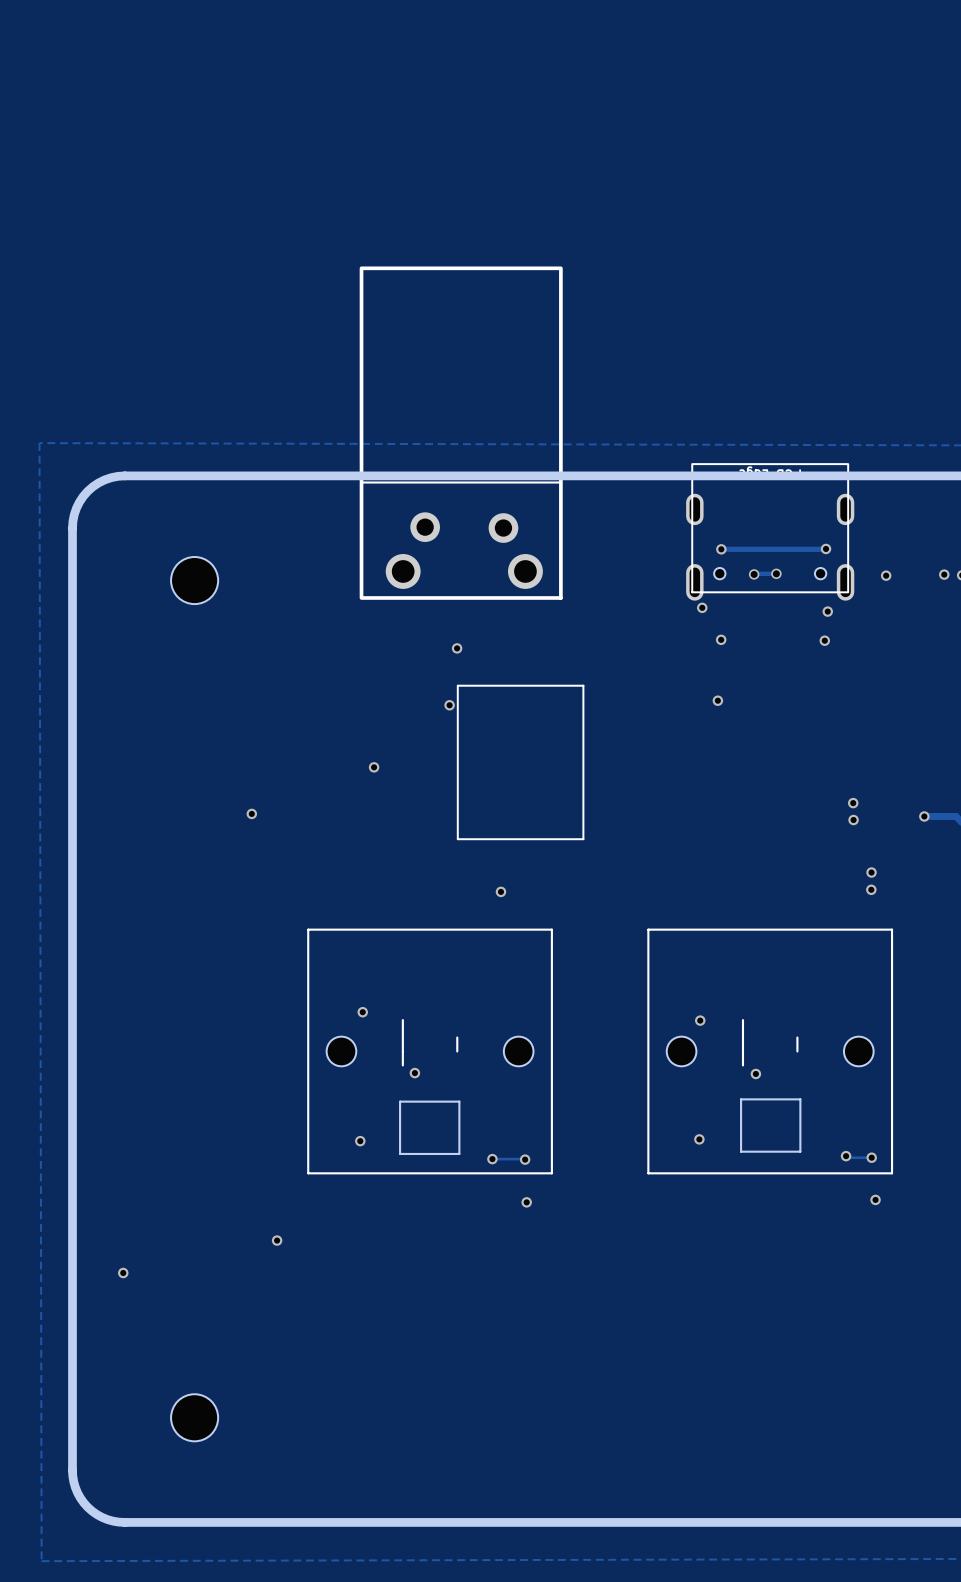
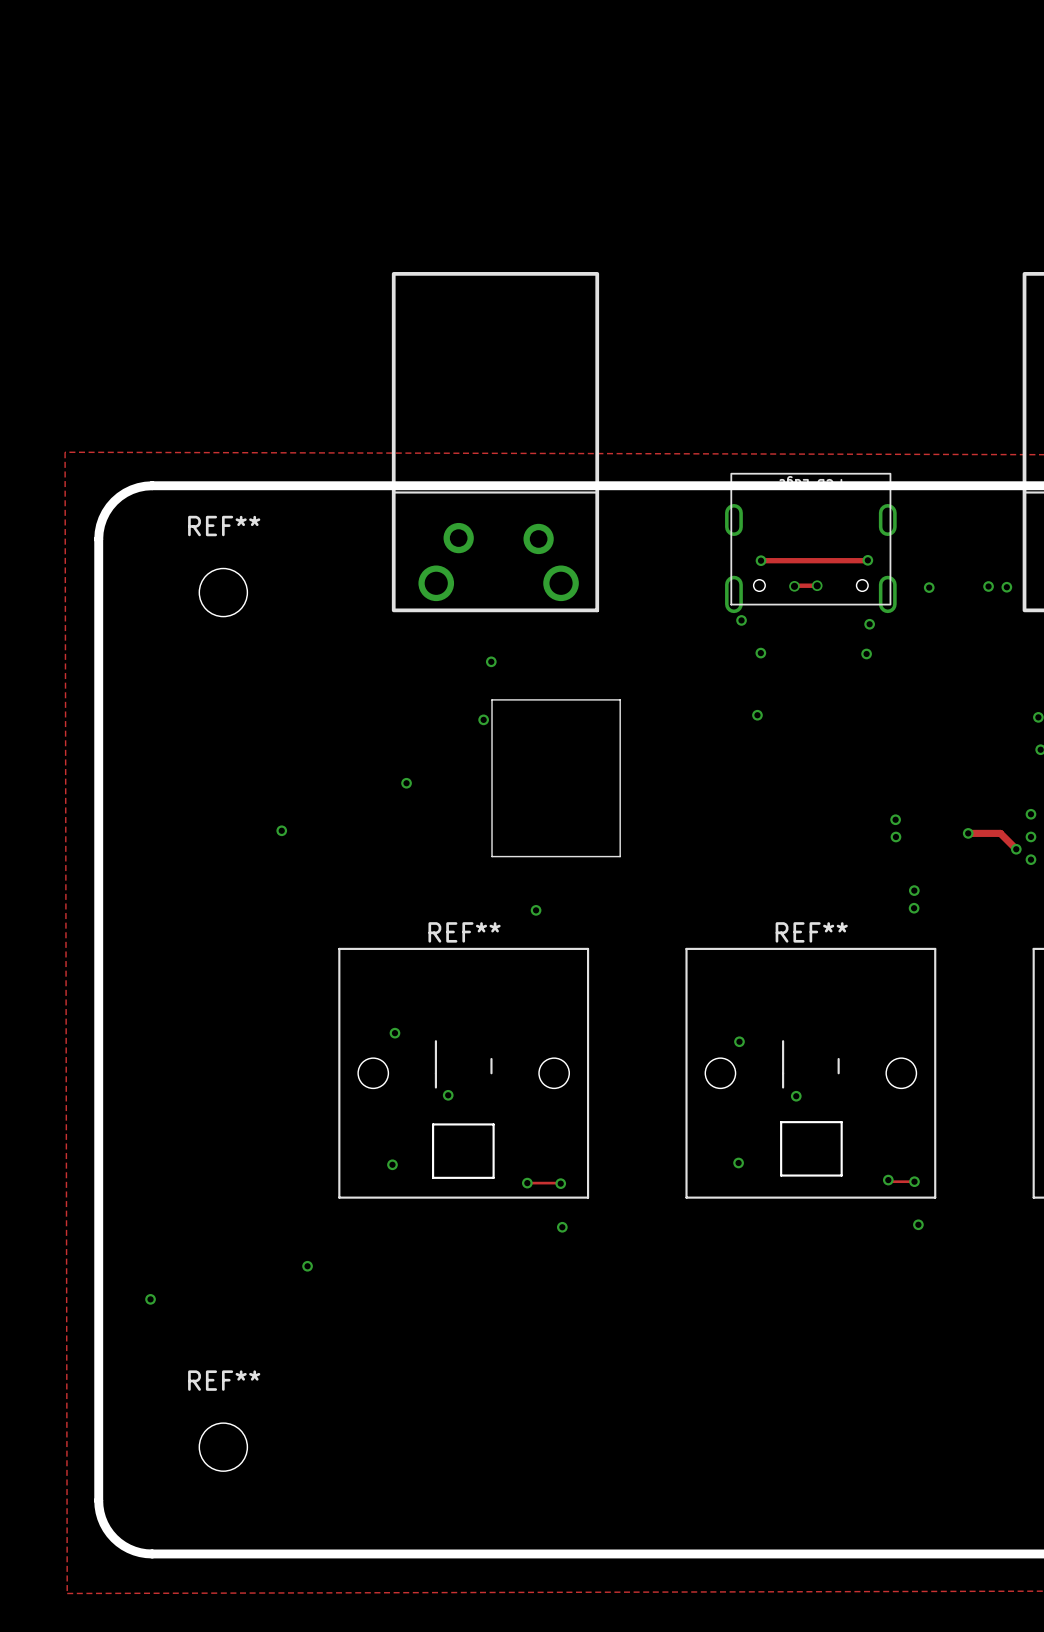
REF** name: none -> REF** (224, 526)
REF** name: none -> REF** (464, 932)
REF** name: none -> REF** (811, 932)
REF** name: none -> REF** (224, 1380)

